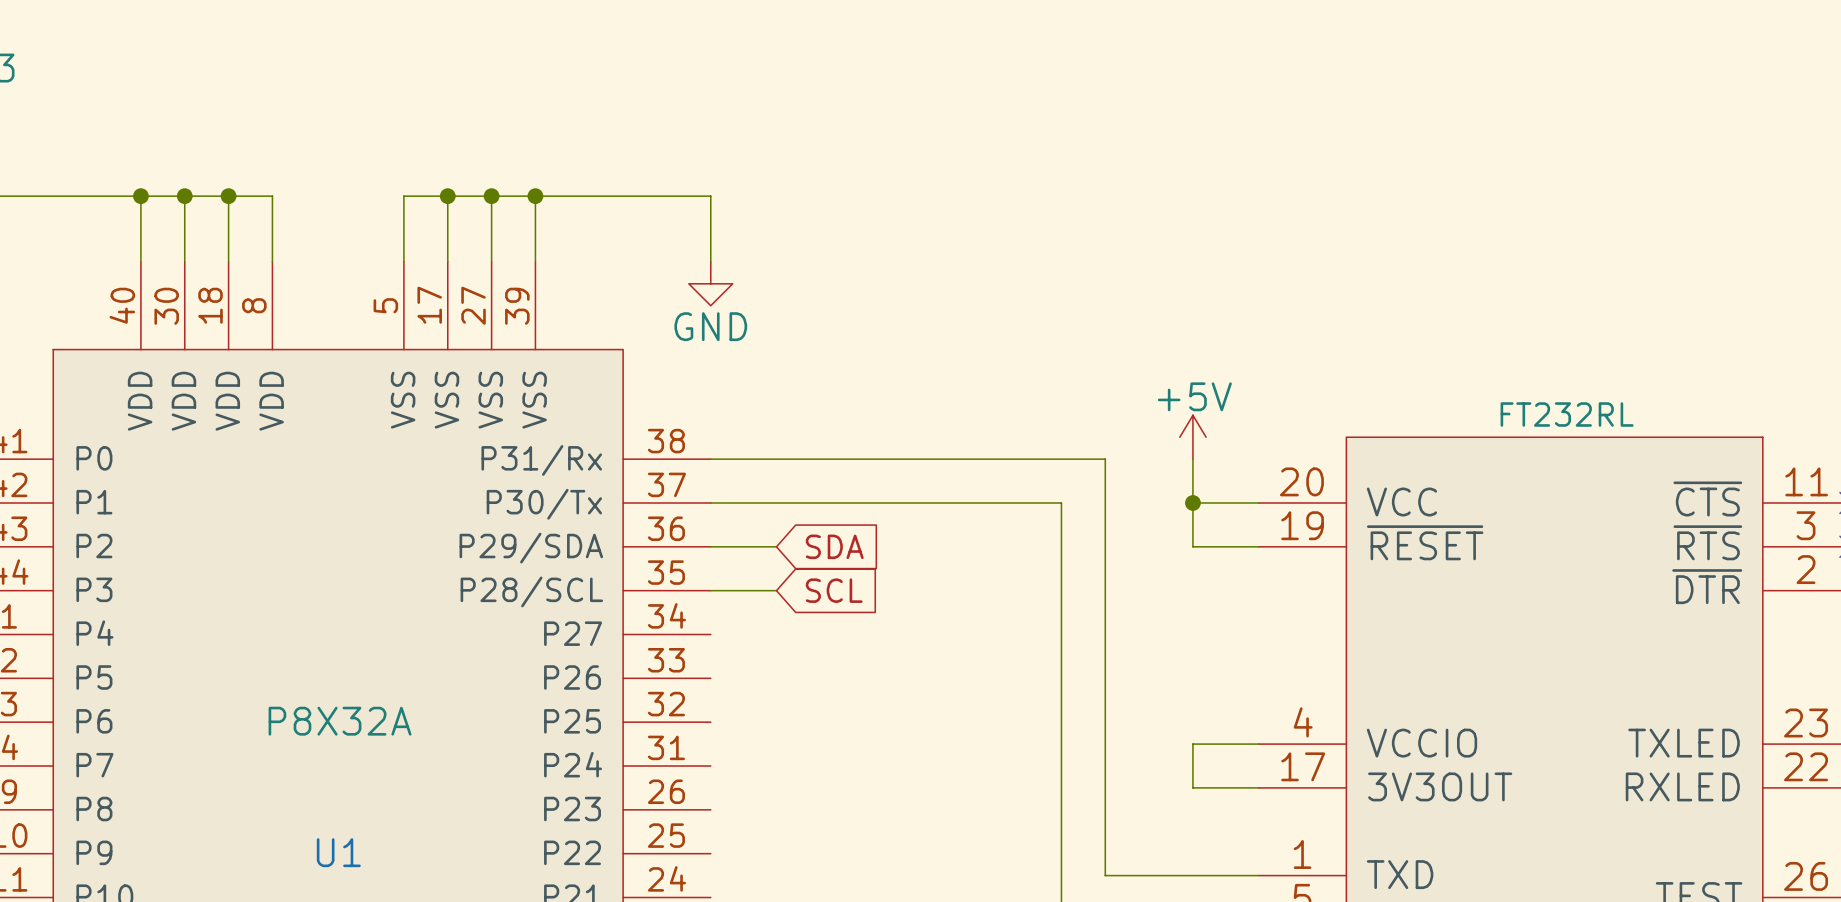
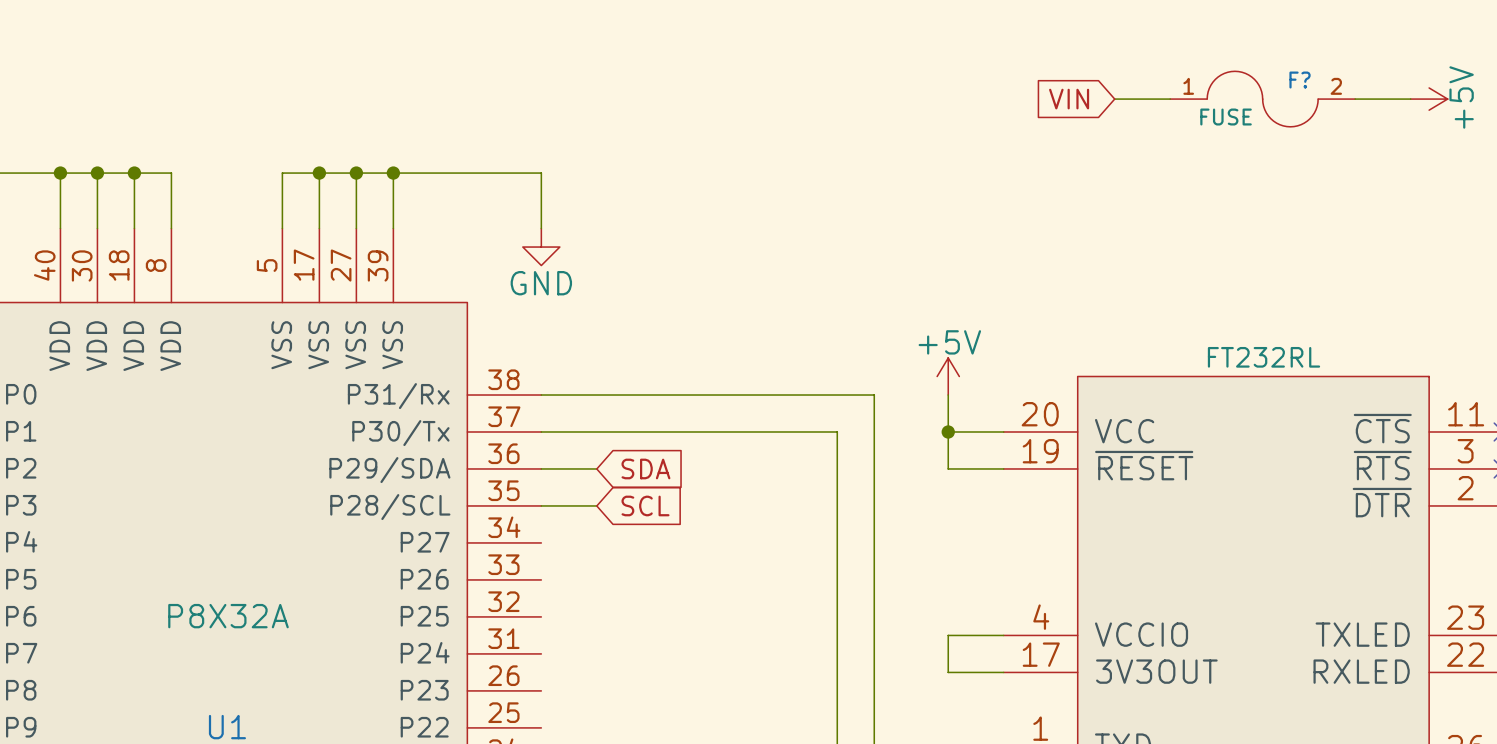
global label: none -> VIN (1069, 99)
wire: none -> (1114, 99) (1170, 99)
F?: none -> FUSE (1262, 99)
wire: none -> (1355, 99) (1410, 99)
power symbol: none -> +5V (1429, 99)

